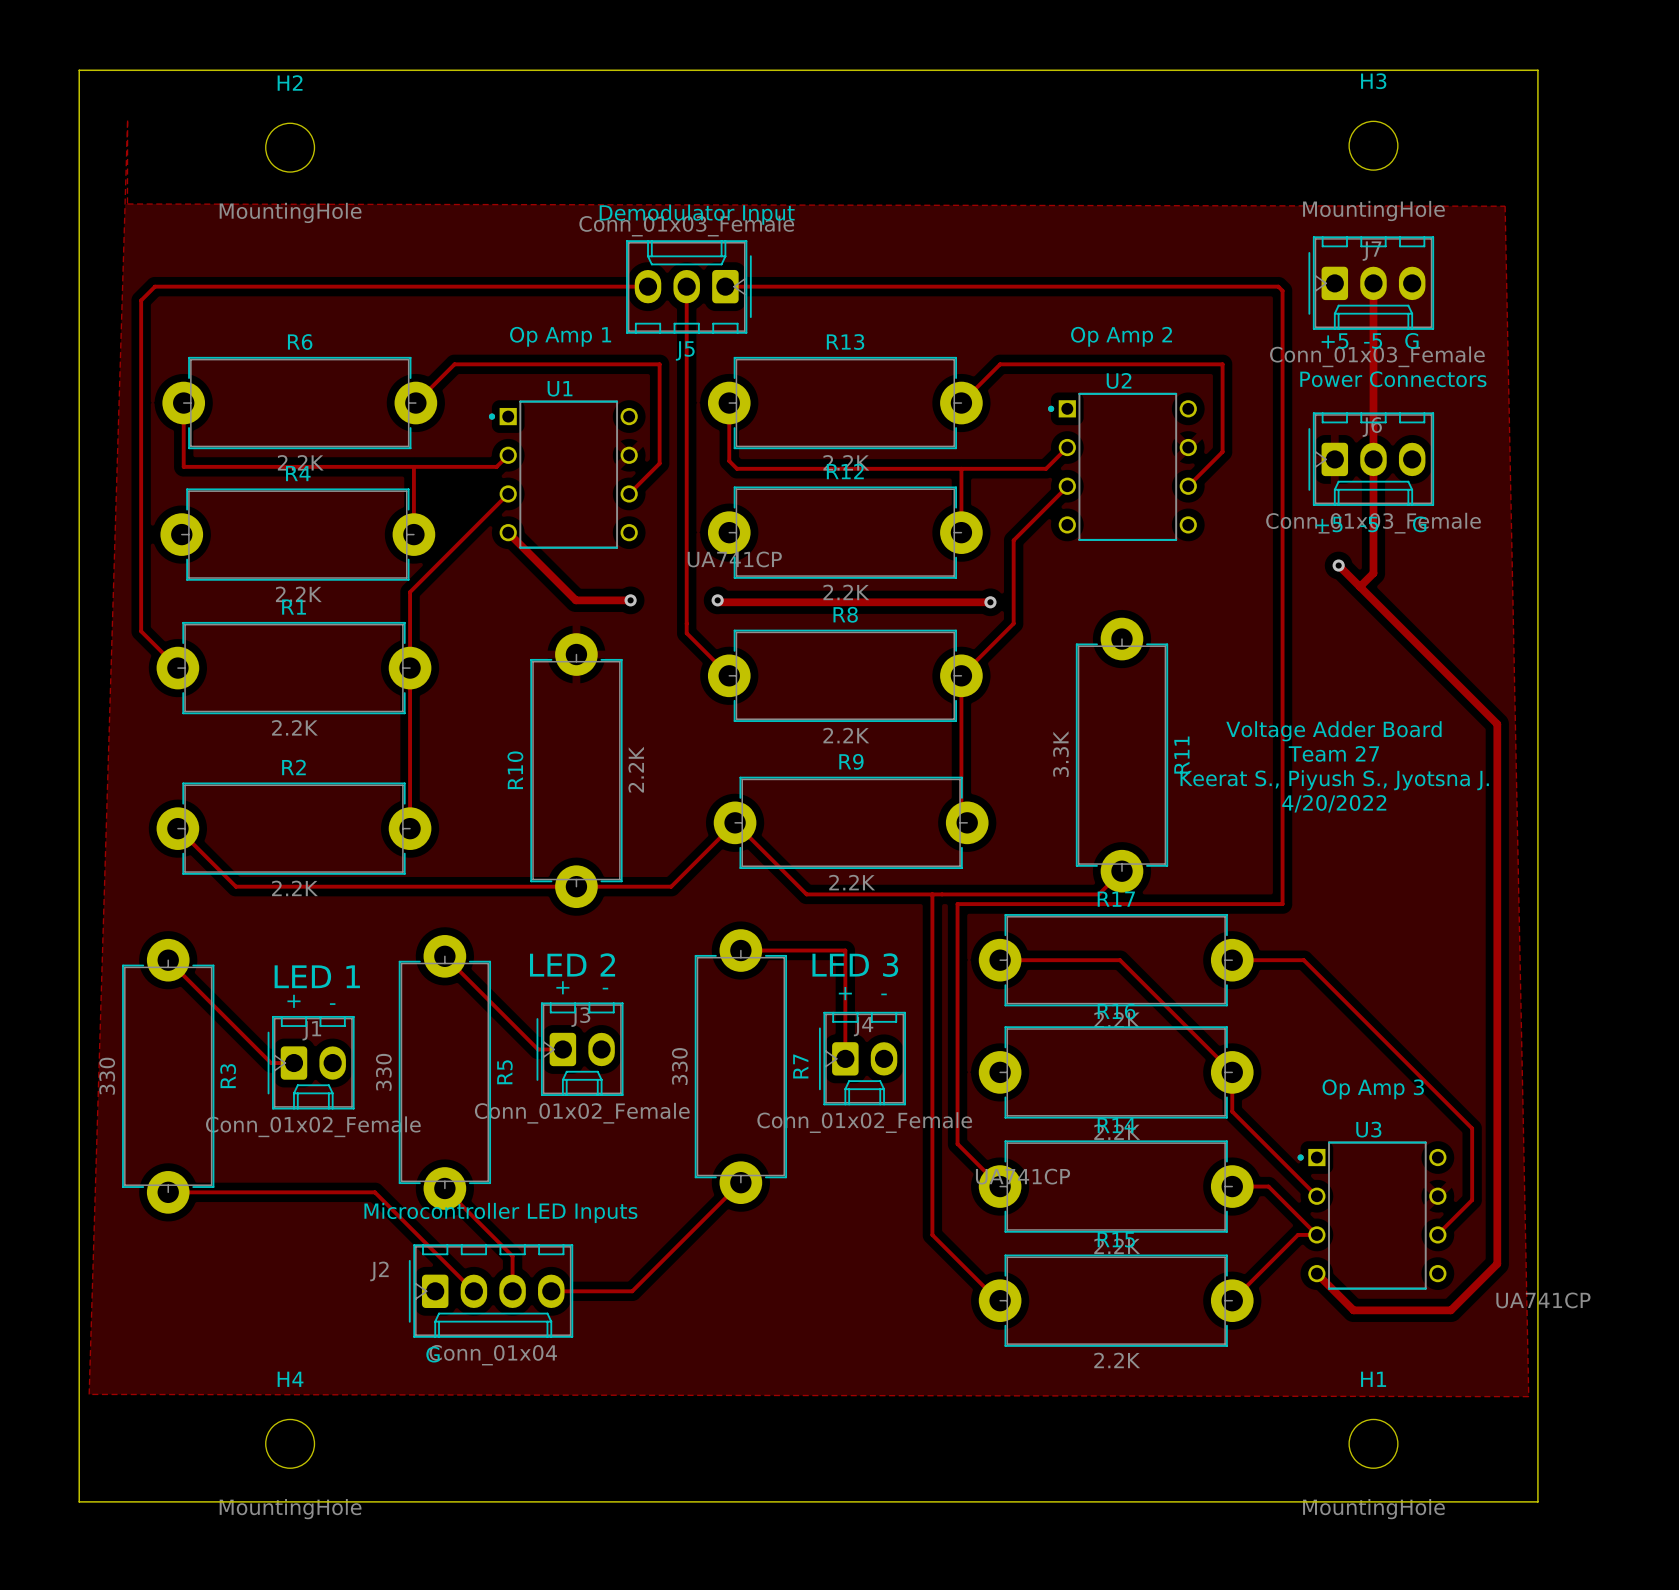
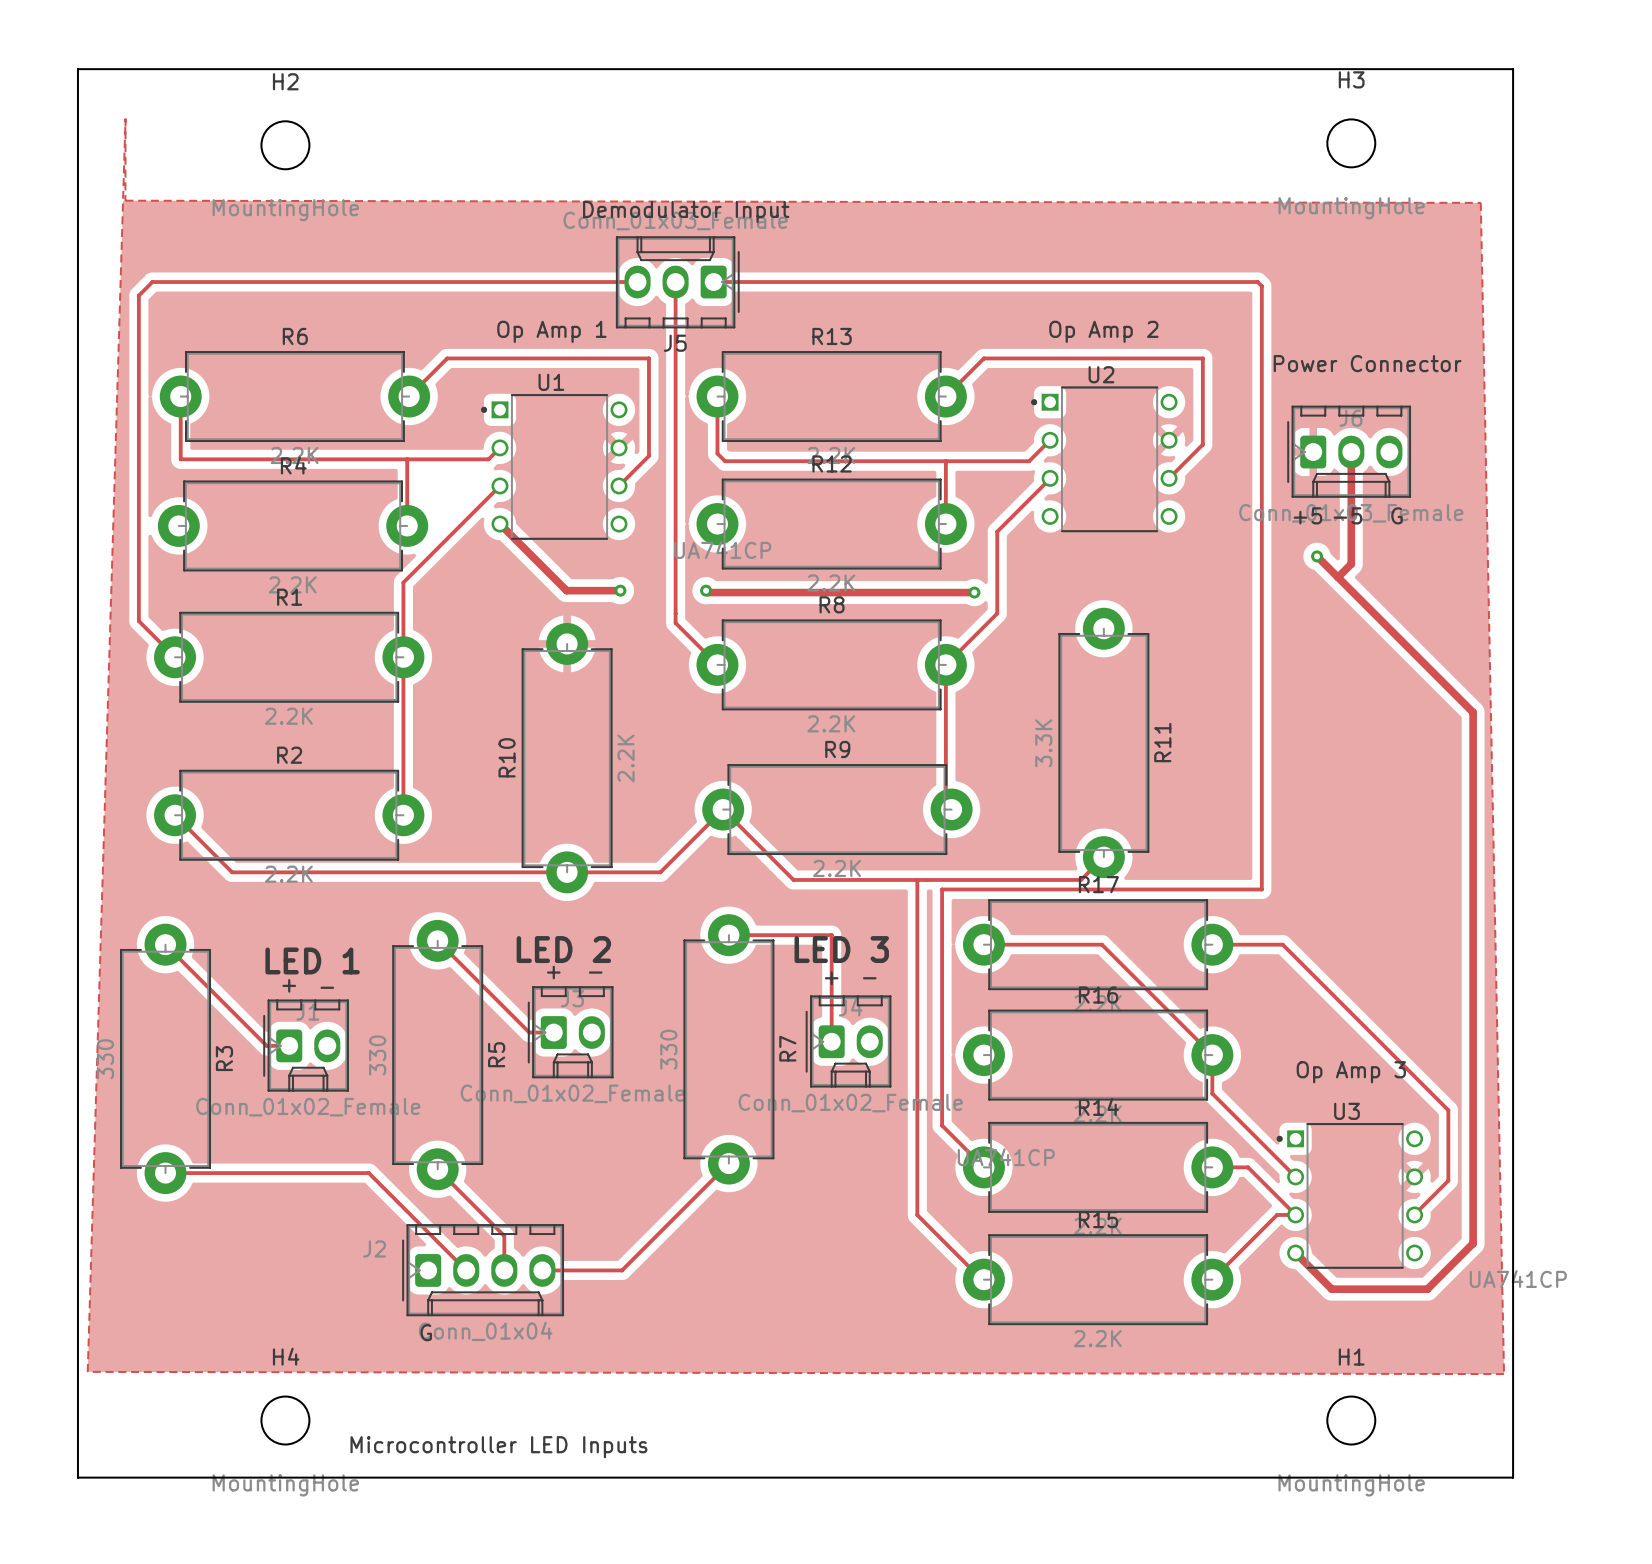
J7: Conn_01x03_Female (1371, 283) -> none
track: (1373, 283) (1373, 459) -> none
text: Power Connectors (1393, 379) -> Power Connector (1367, 363)
text: Voltage Adder Board (1333, 731) -> none
text: Team 27 (1333, 753) -> none
text: Keerat S., Piyush S., Jyotsna J. (1334, 780) -> none
text: 4/20/2022 (1334, 803) -> none
text position: Microcontroller LED Inputs (500, 1212) -> Microcontroller LED Inputs (498, 1447)

